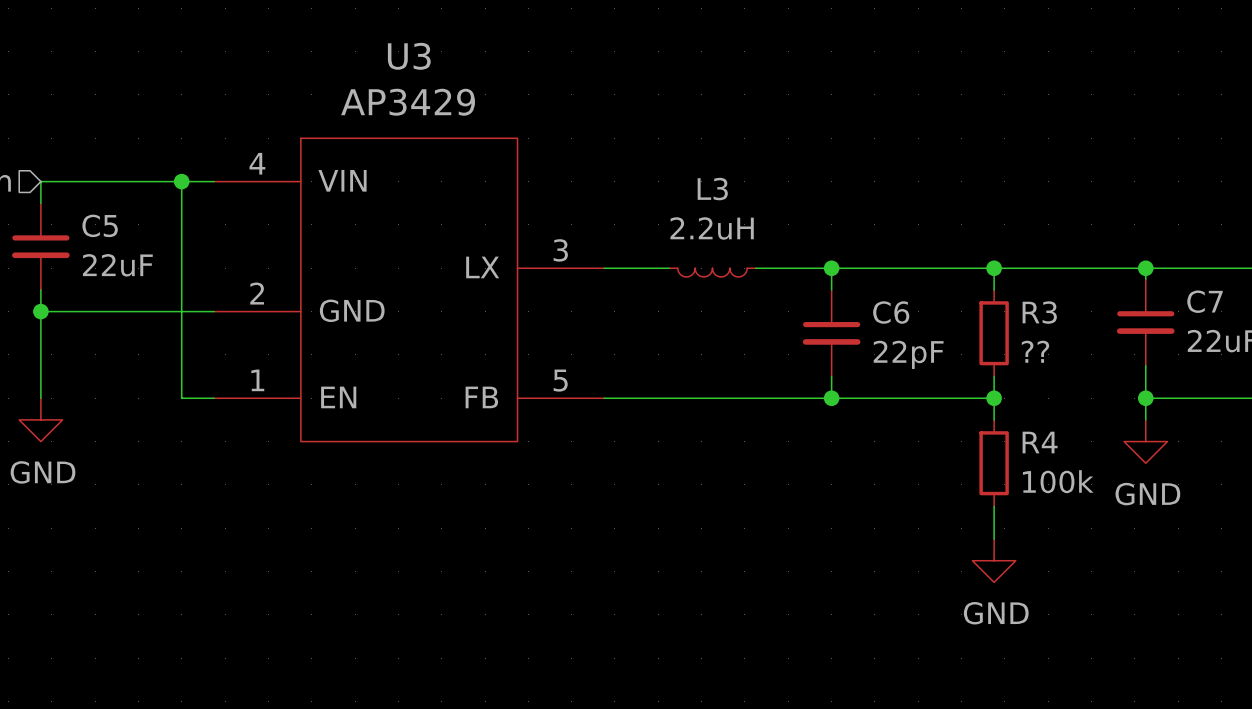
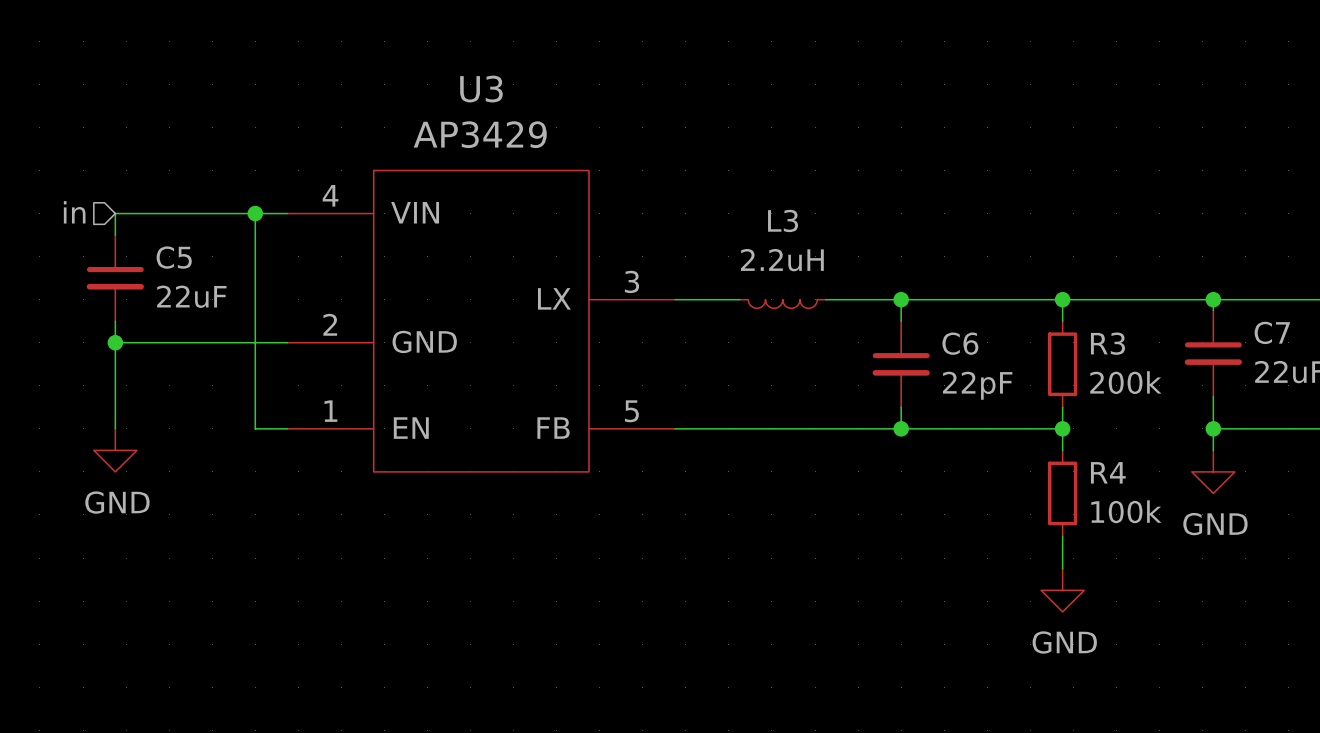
R3 value: ?? (1035, 351) -> 200k (1125, 382)

